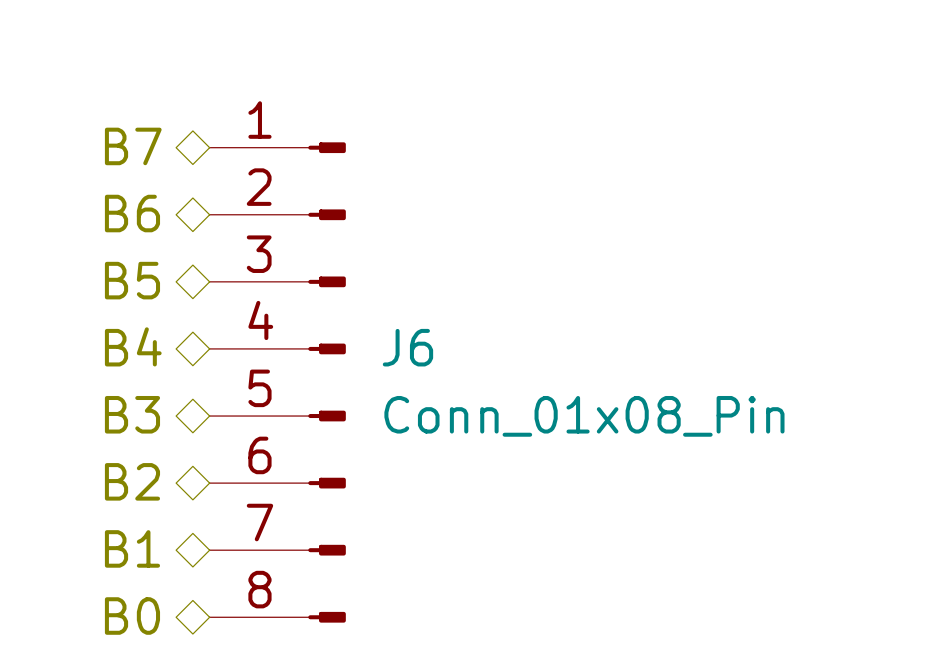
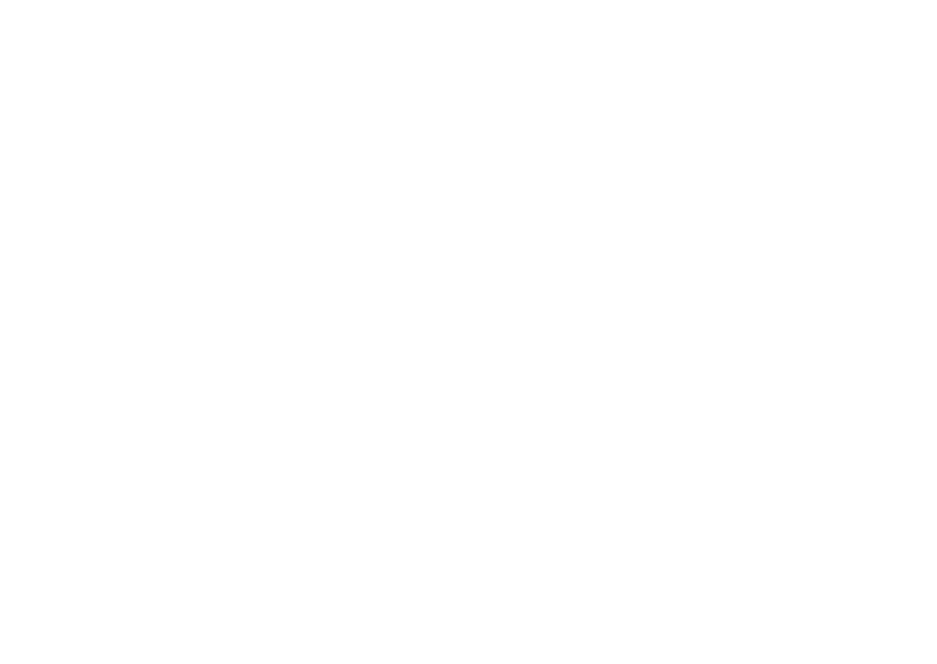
hierarchical label: B7 (133, 146) -> none
hierarchical label: B6 (132, 213) -> none
hierarchical label: B5 (132, 280) -> none
hierarchical label: B4 (133, 346) -> none
J6: Conn_01x08_Pin (277, 382) -> none
hierarchical label: B3 (132, 414) -> none
hierarchical label: B2 (132, 481) -> none
hierarchical label: B1 (132, 548) -> none
hierarchical label: B0 (132, 616) -> none

